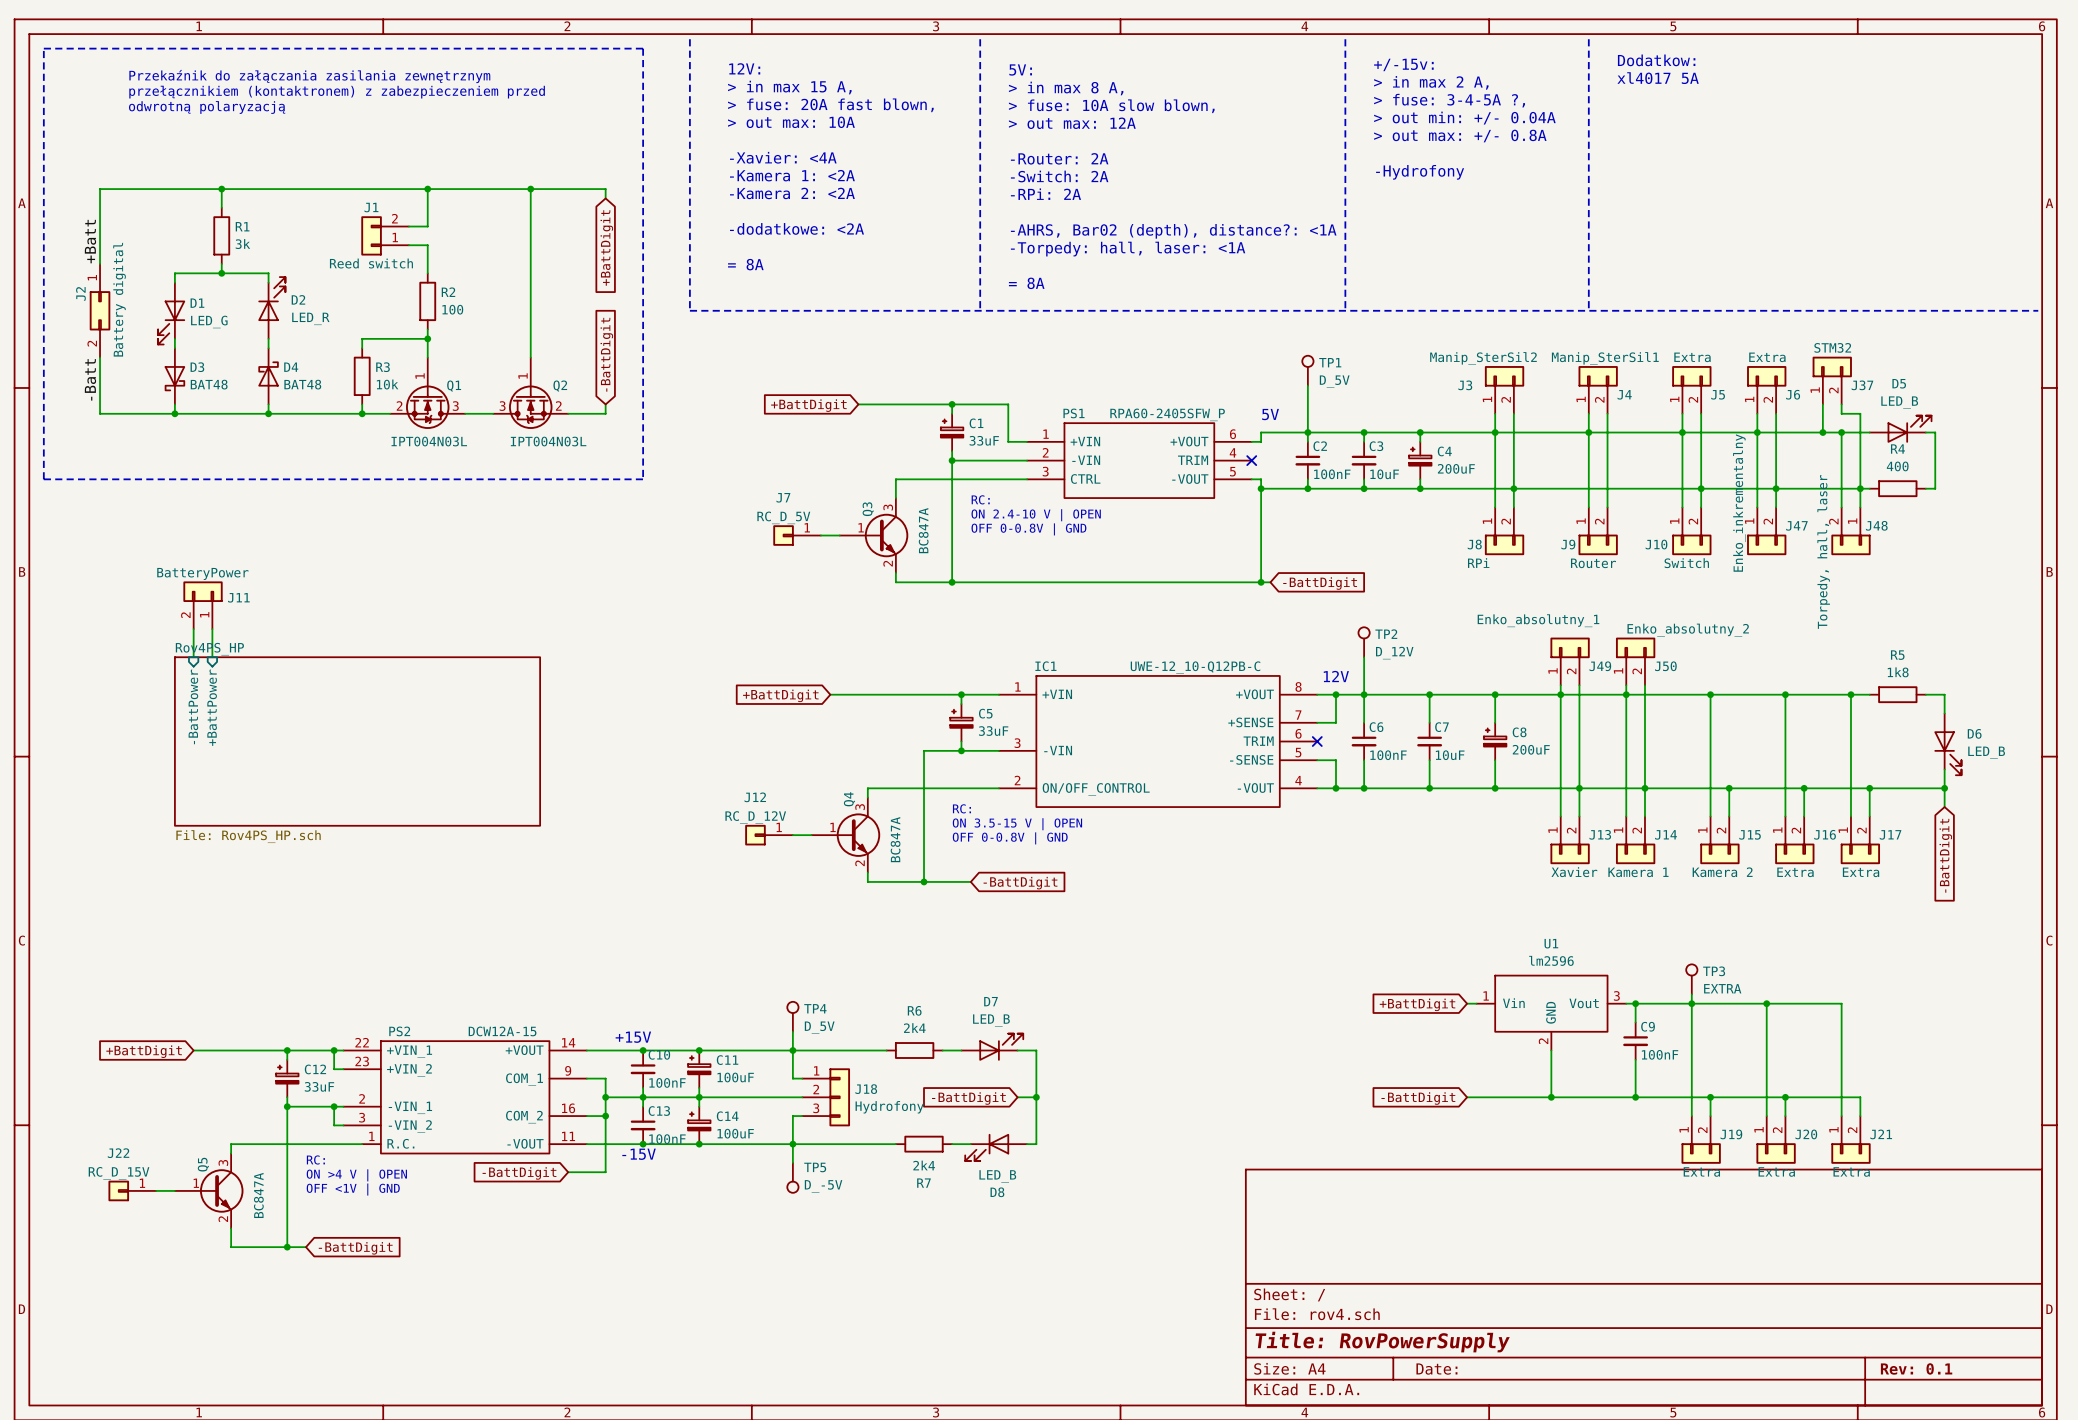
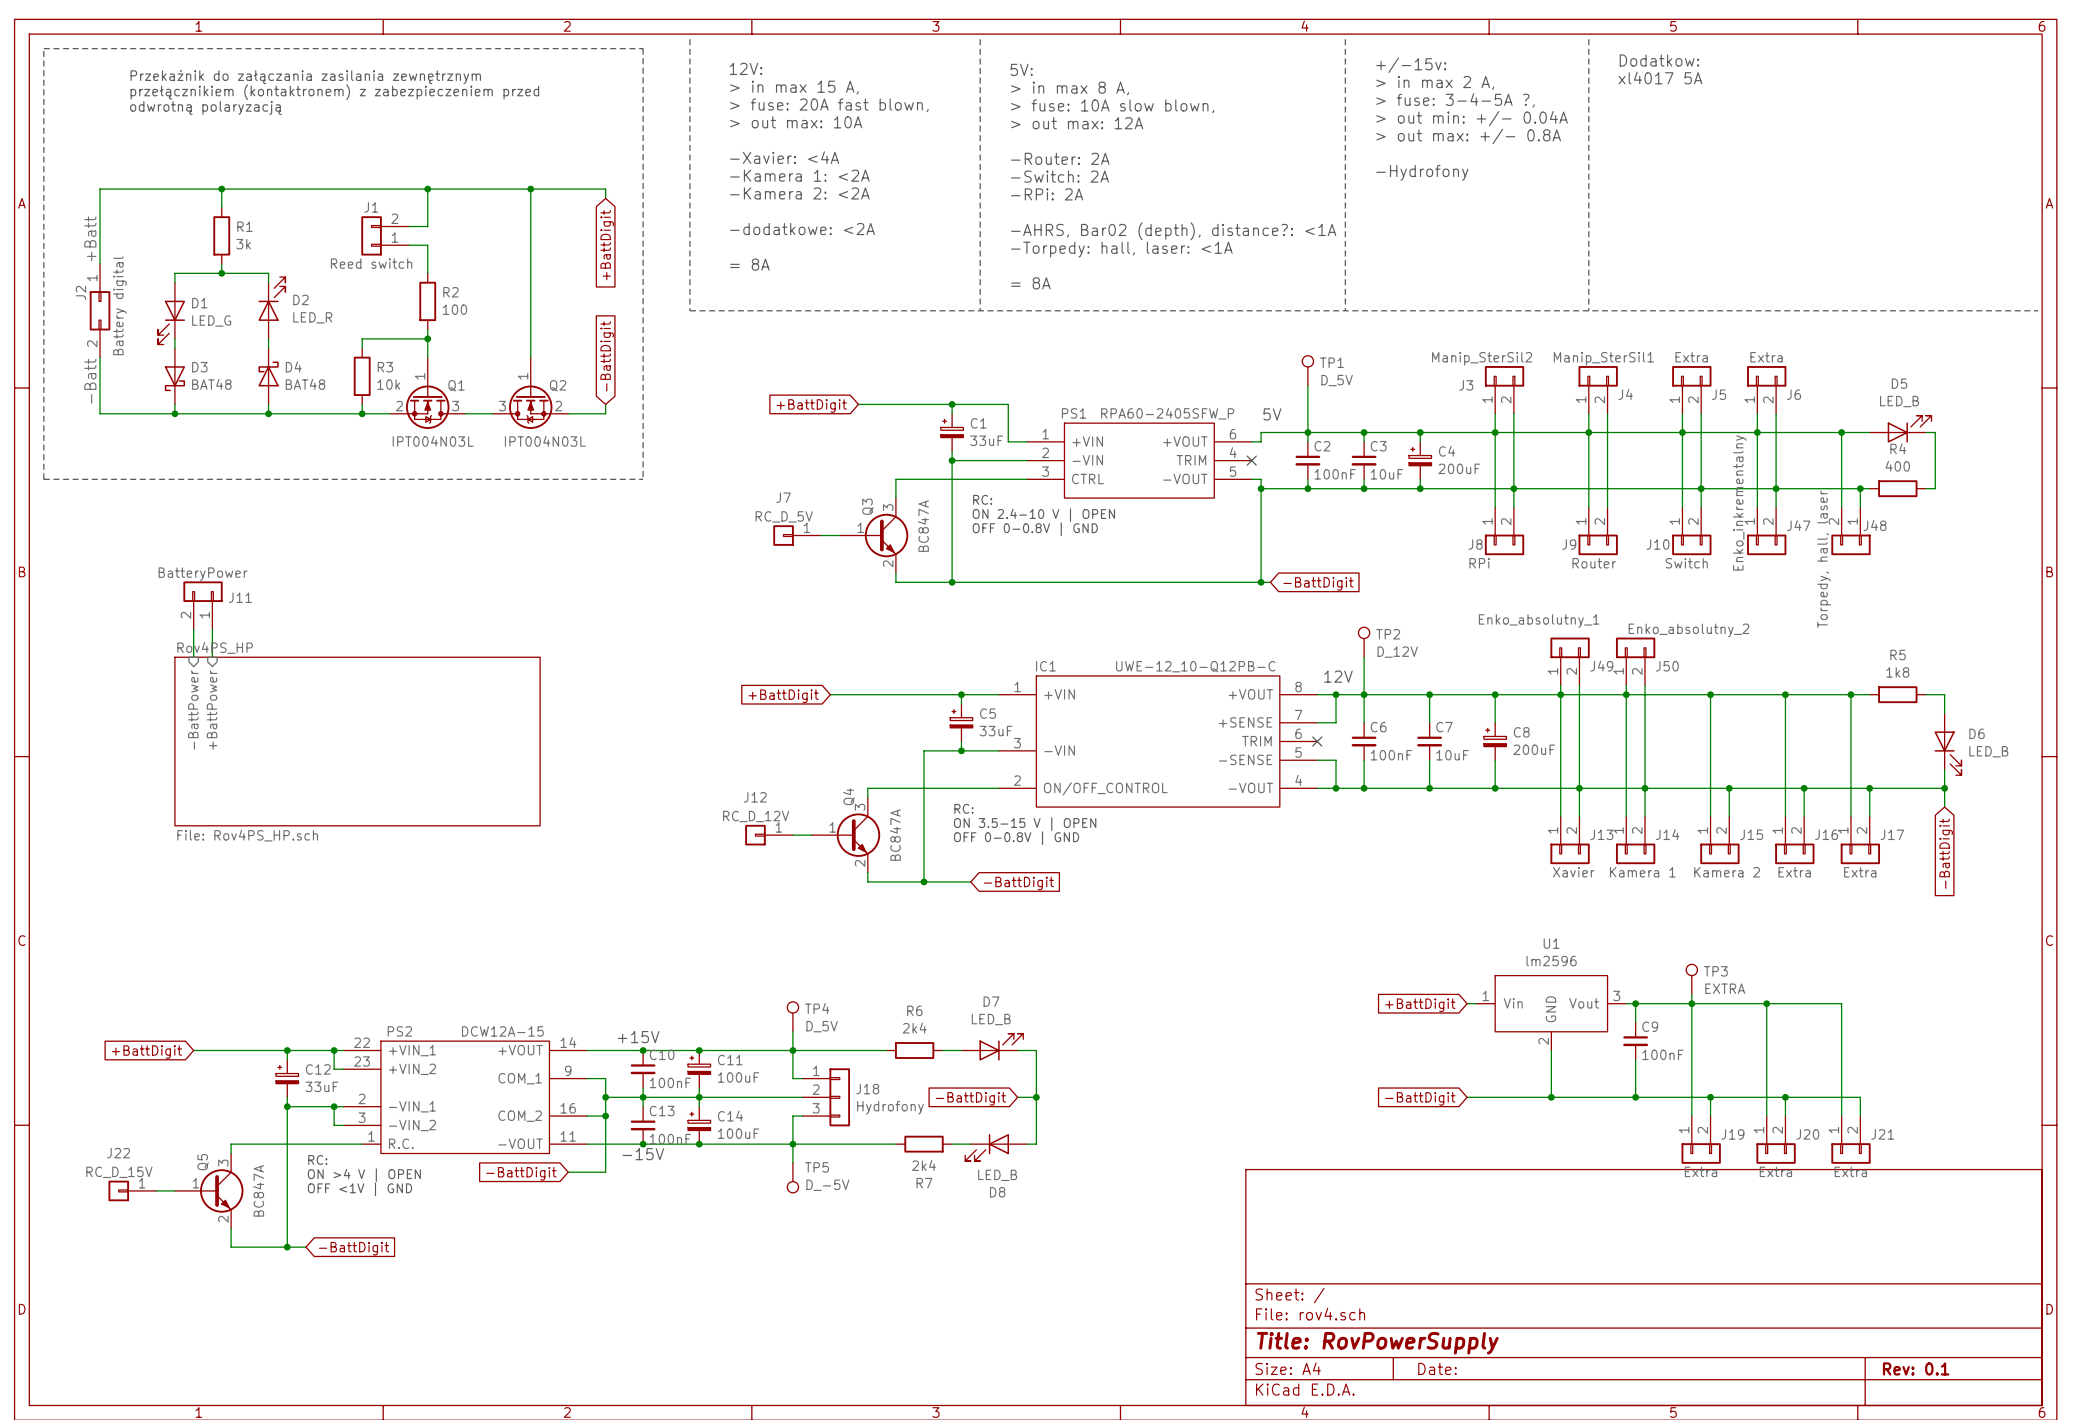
J37: STM32 (1832, 380) -> none
wire: (1822, 404) (1822, 432) -> none
wire: (1841, 404) (1841, 413) (1860, 413) (1860, 488) -> none
junction: (1822, 432) -> none

